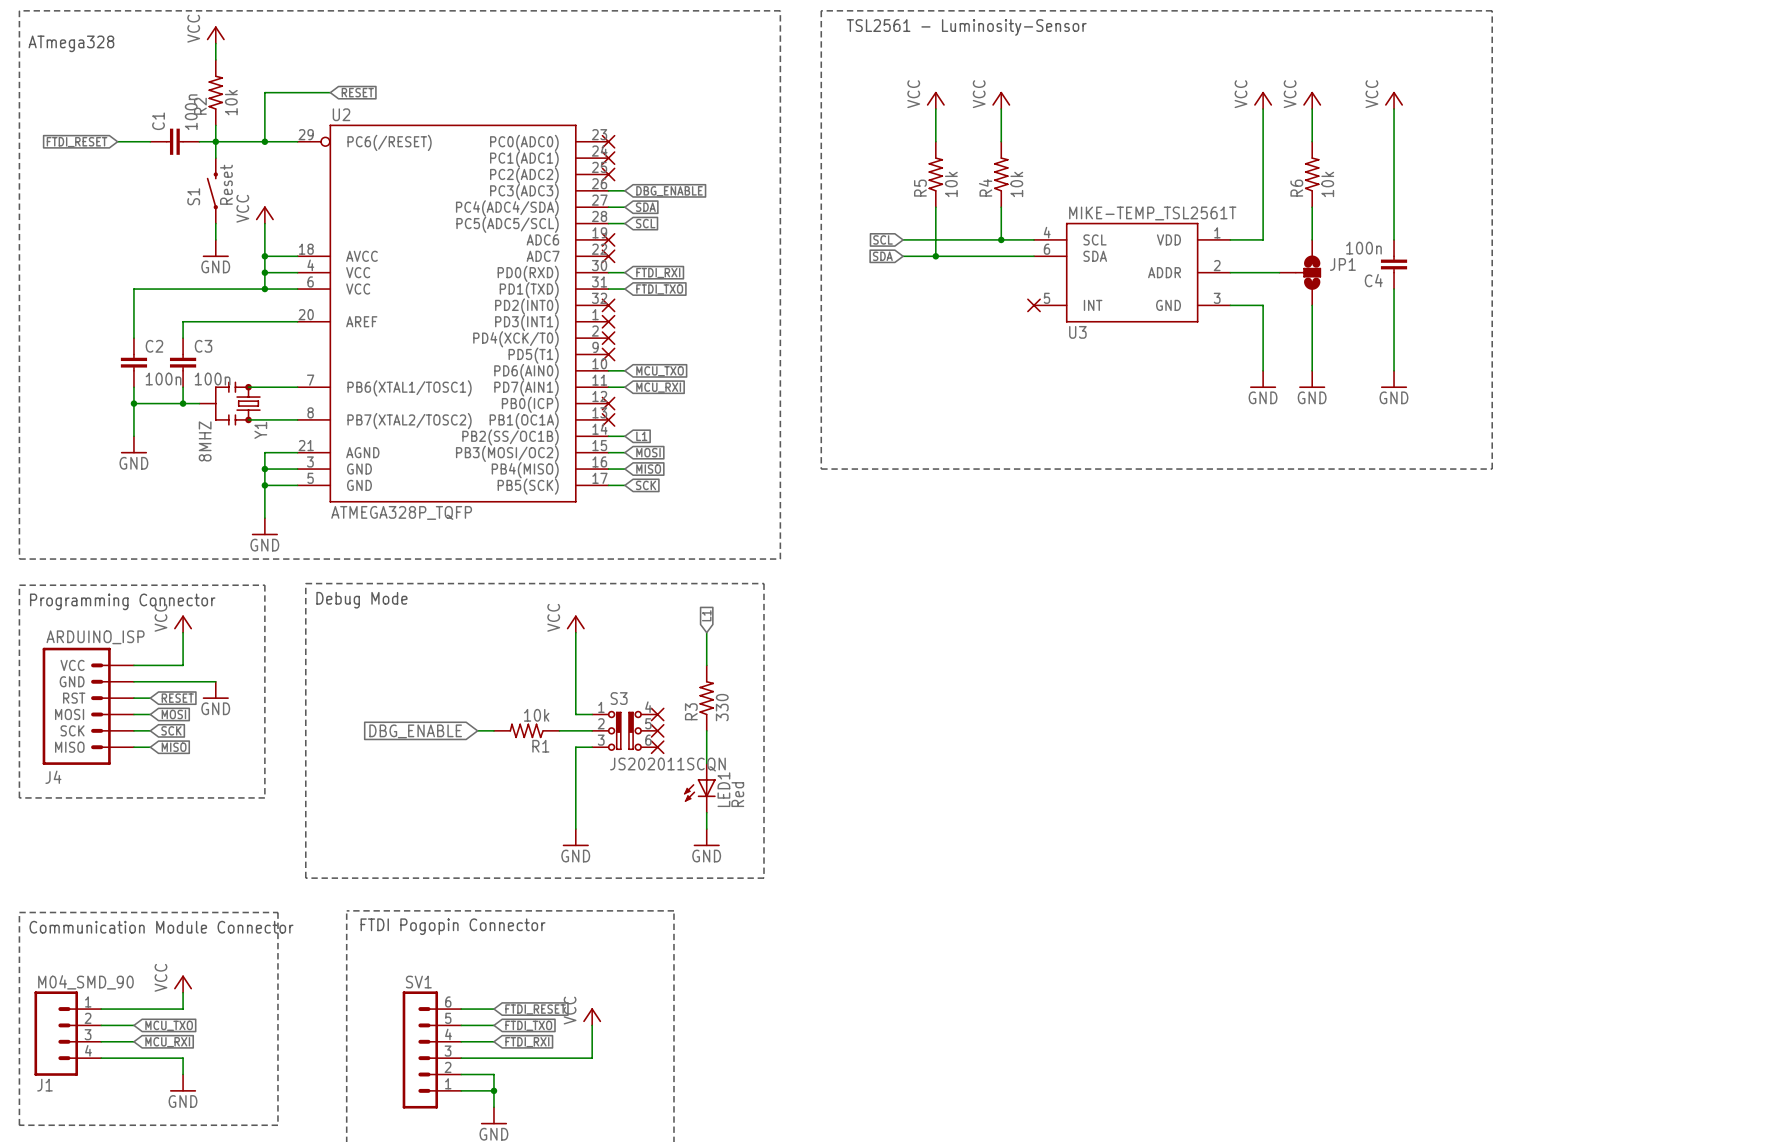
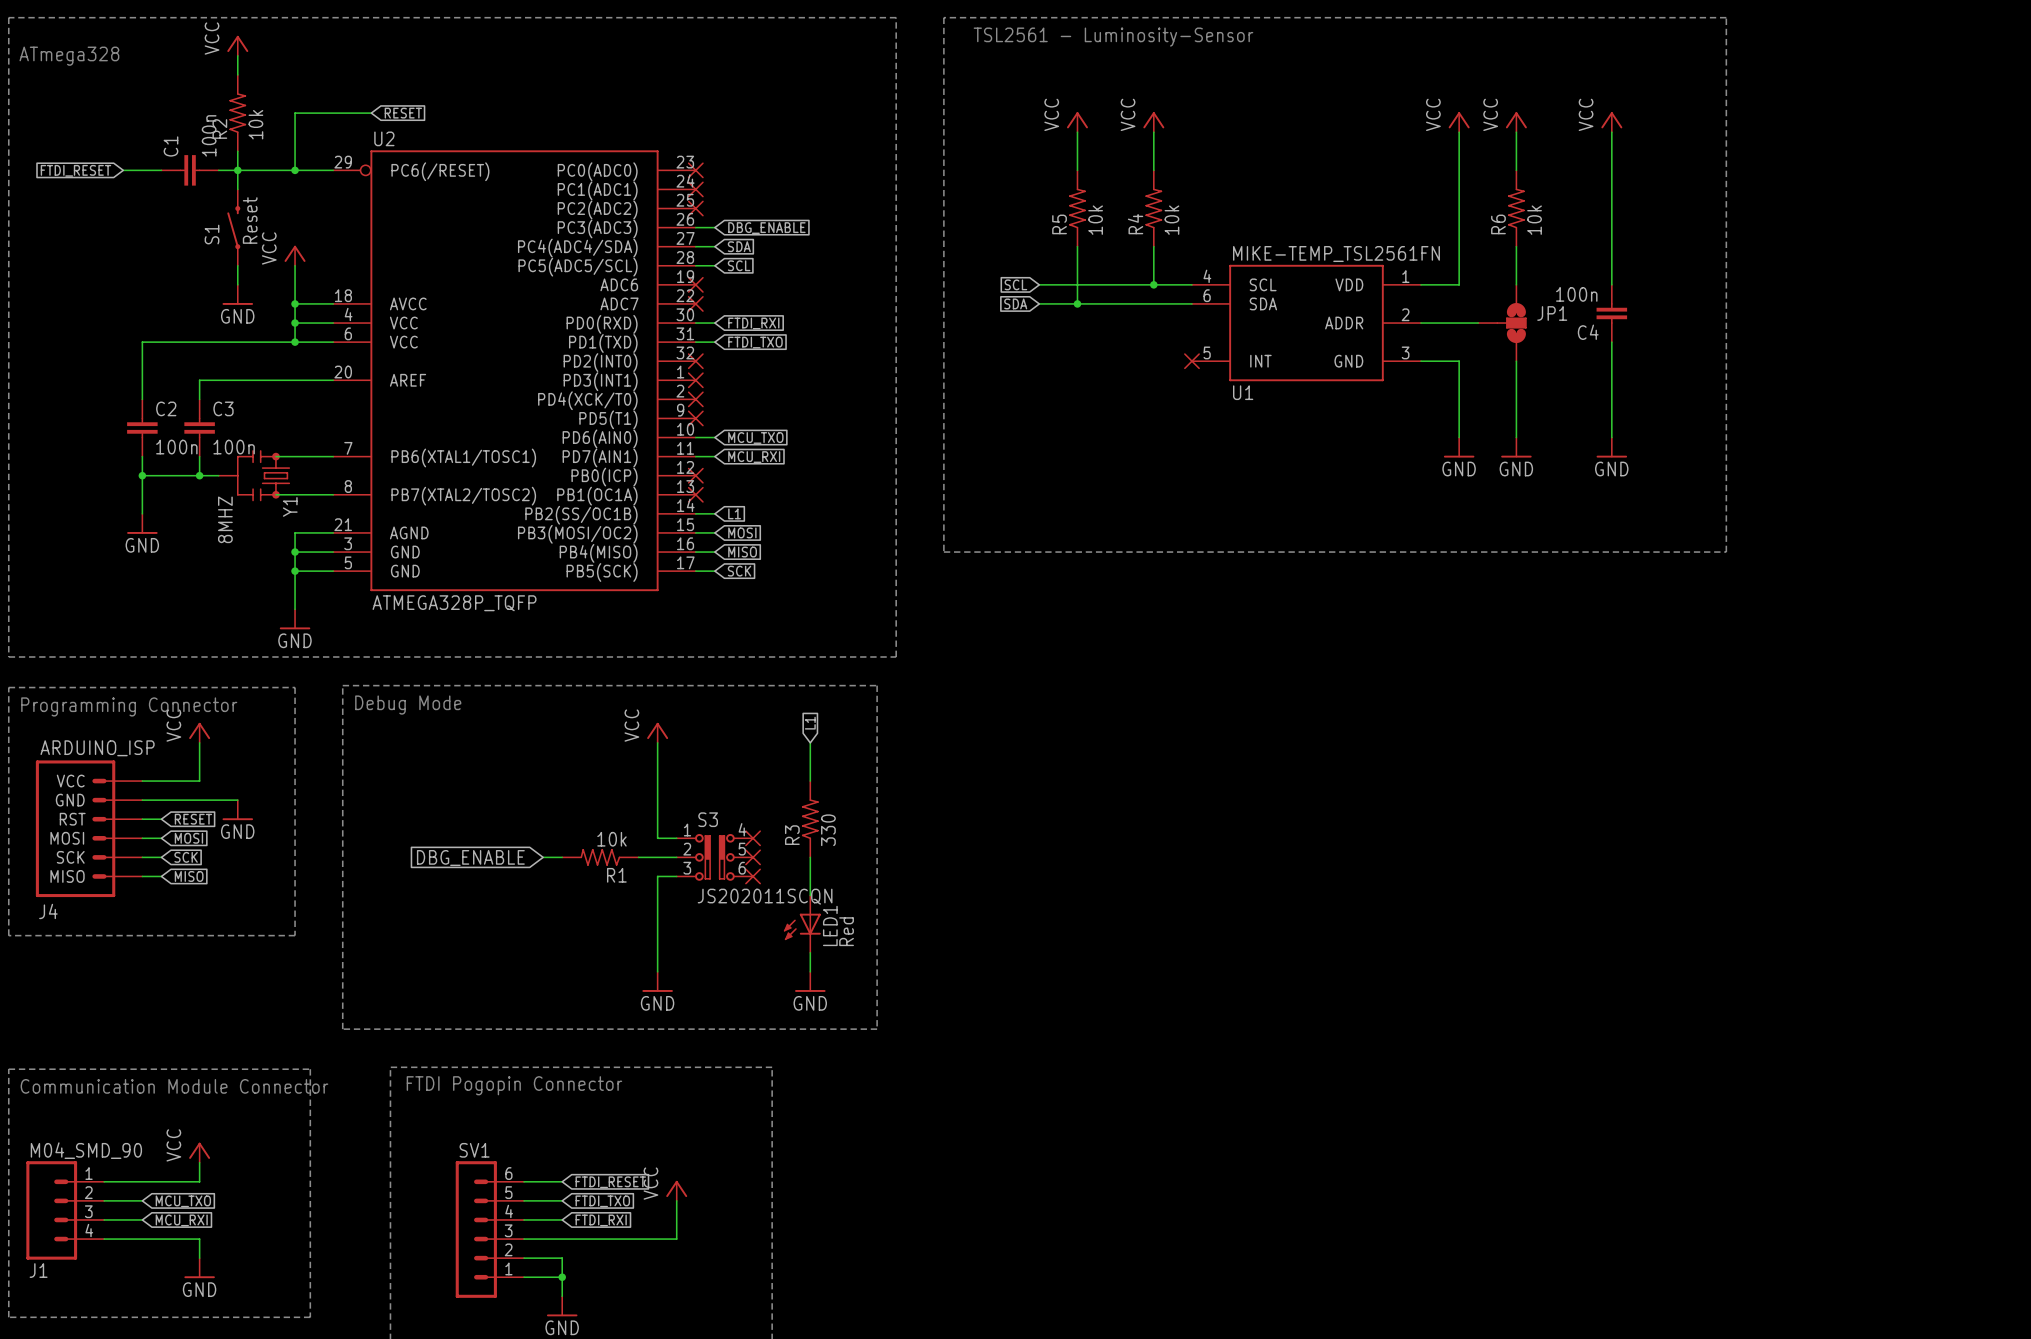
U3 value: MIKE-TEMP_TSL2561T (1152, 213) -> MIKE-TEMP_TSL2561FN (1336, 254)
U3 name: U3 (1077, 332) -> U1 (1243, 392)

